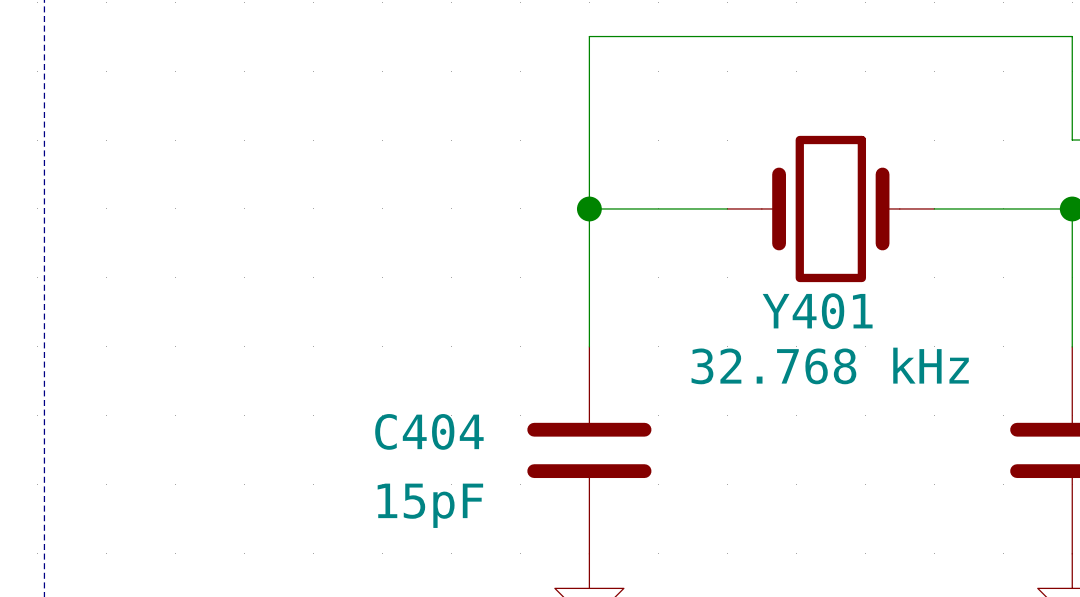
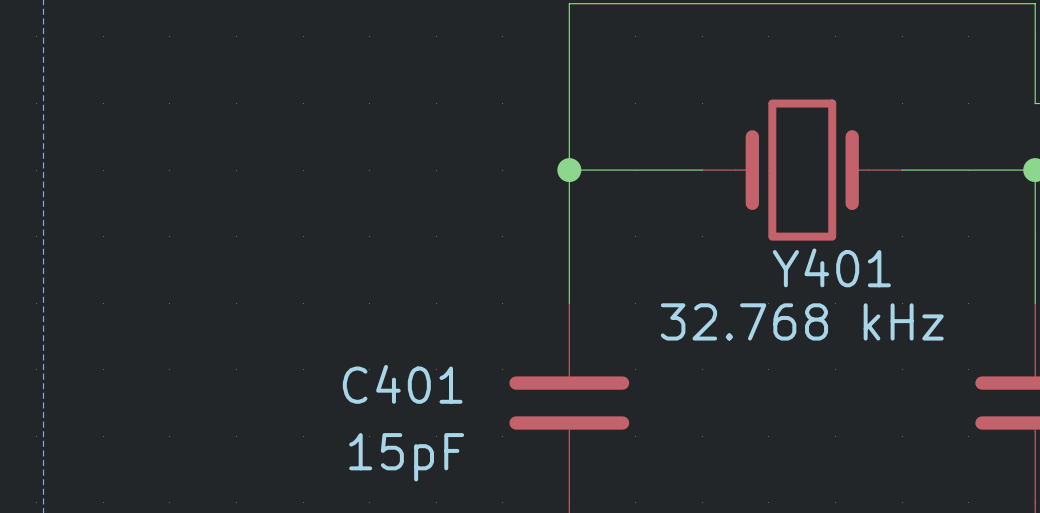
Y401 name position: Y401 (817, 311) -> Y401 (831, 267)
C404 name: C404 (429, 431) -> C401 (402, 384)

